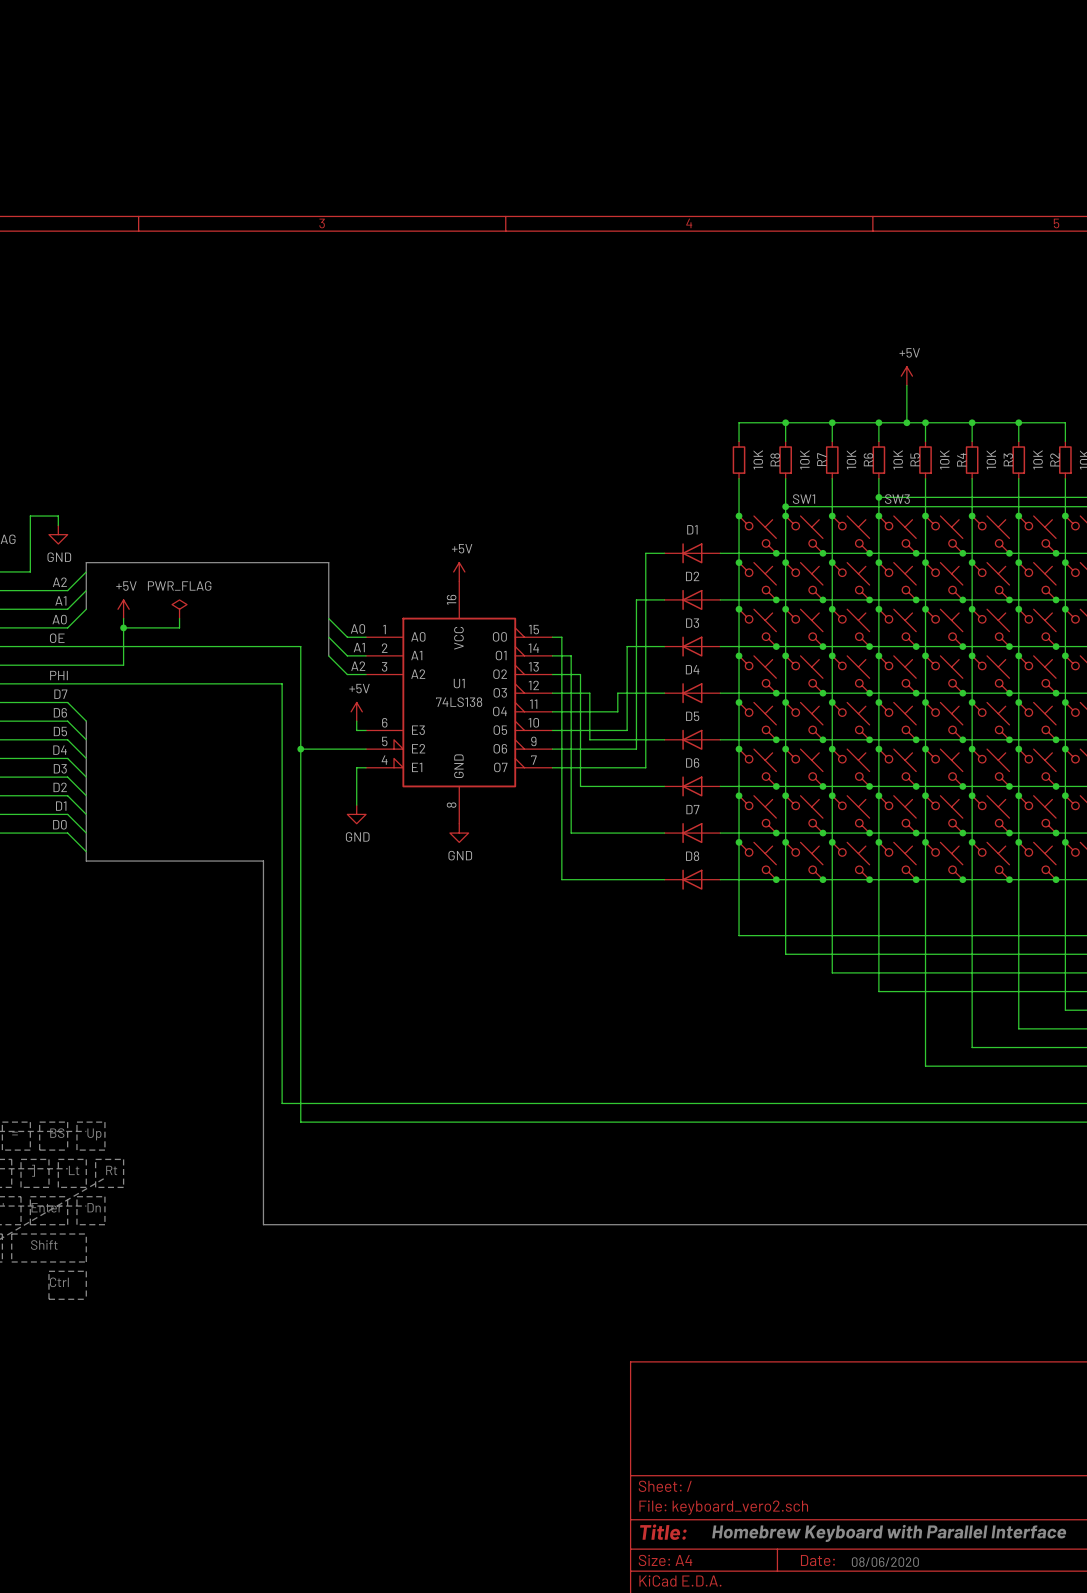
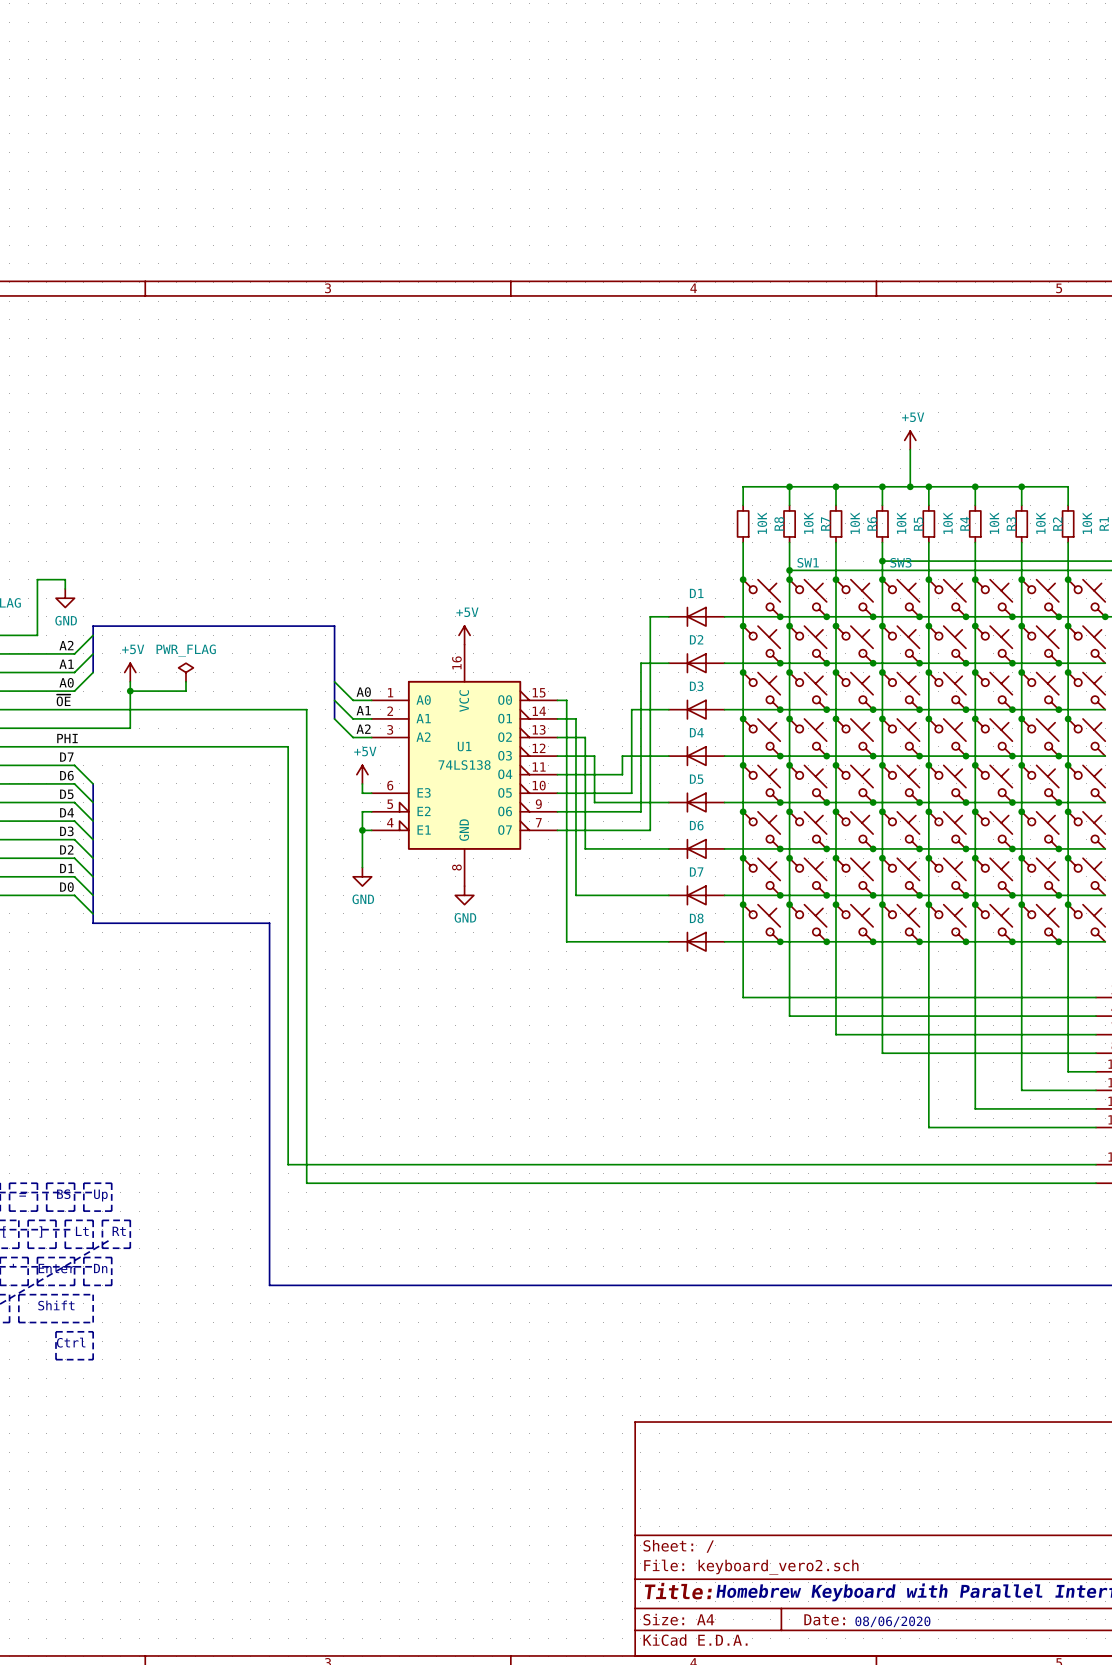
label: OE (57, 638) -> ~{OE} (63, 700)
wire: (300, 749) (356, 749) -> (362, 830) (362, 811)
junction: (300, 749) -> none
junction: none -> (362, 830)

